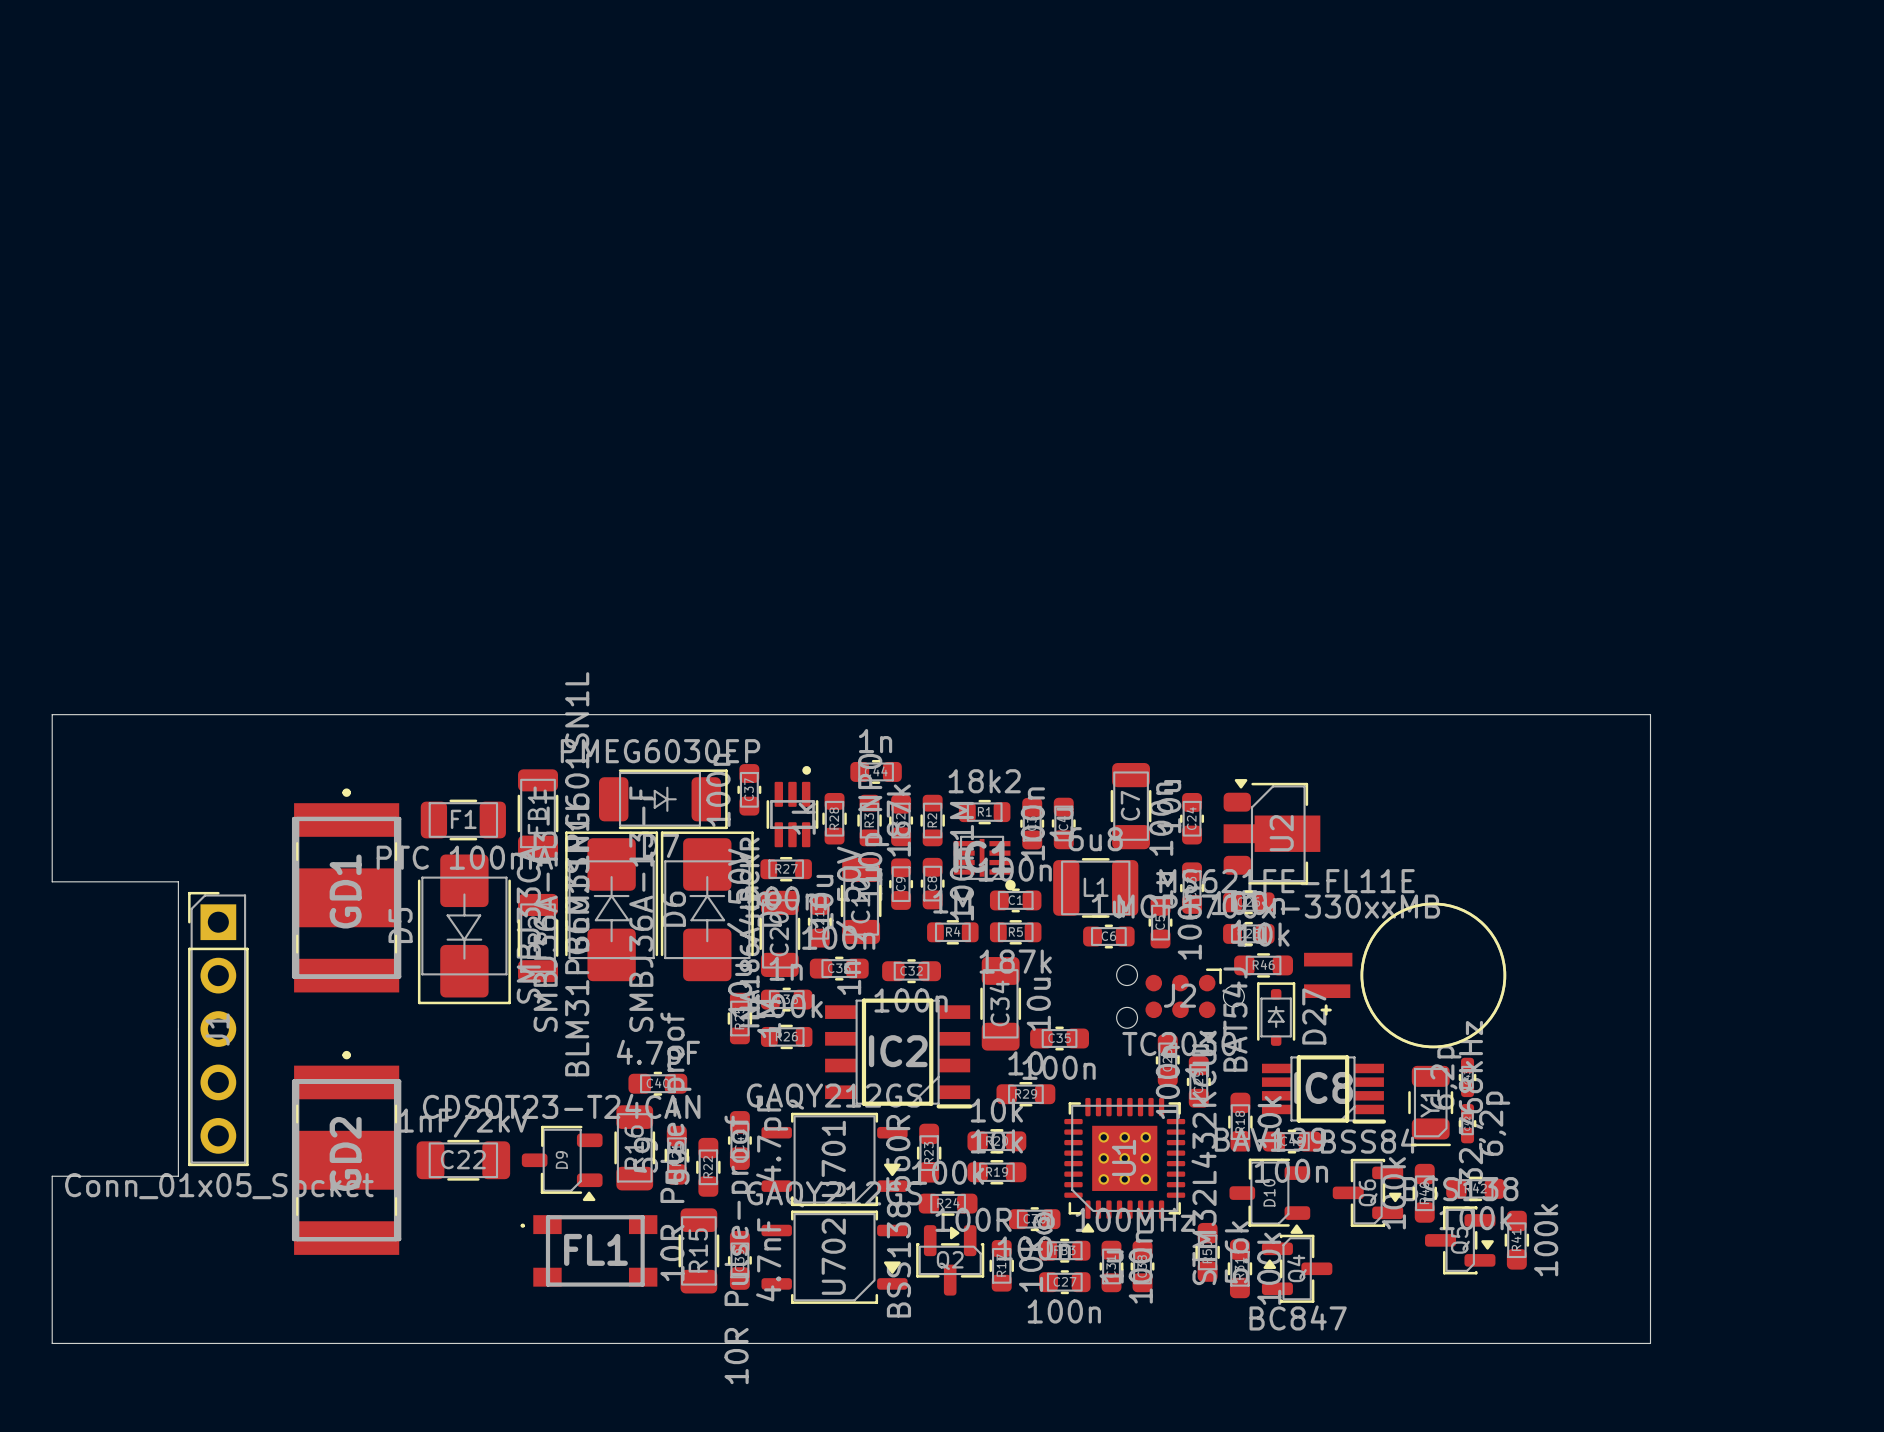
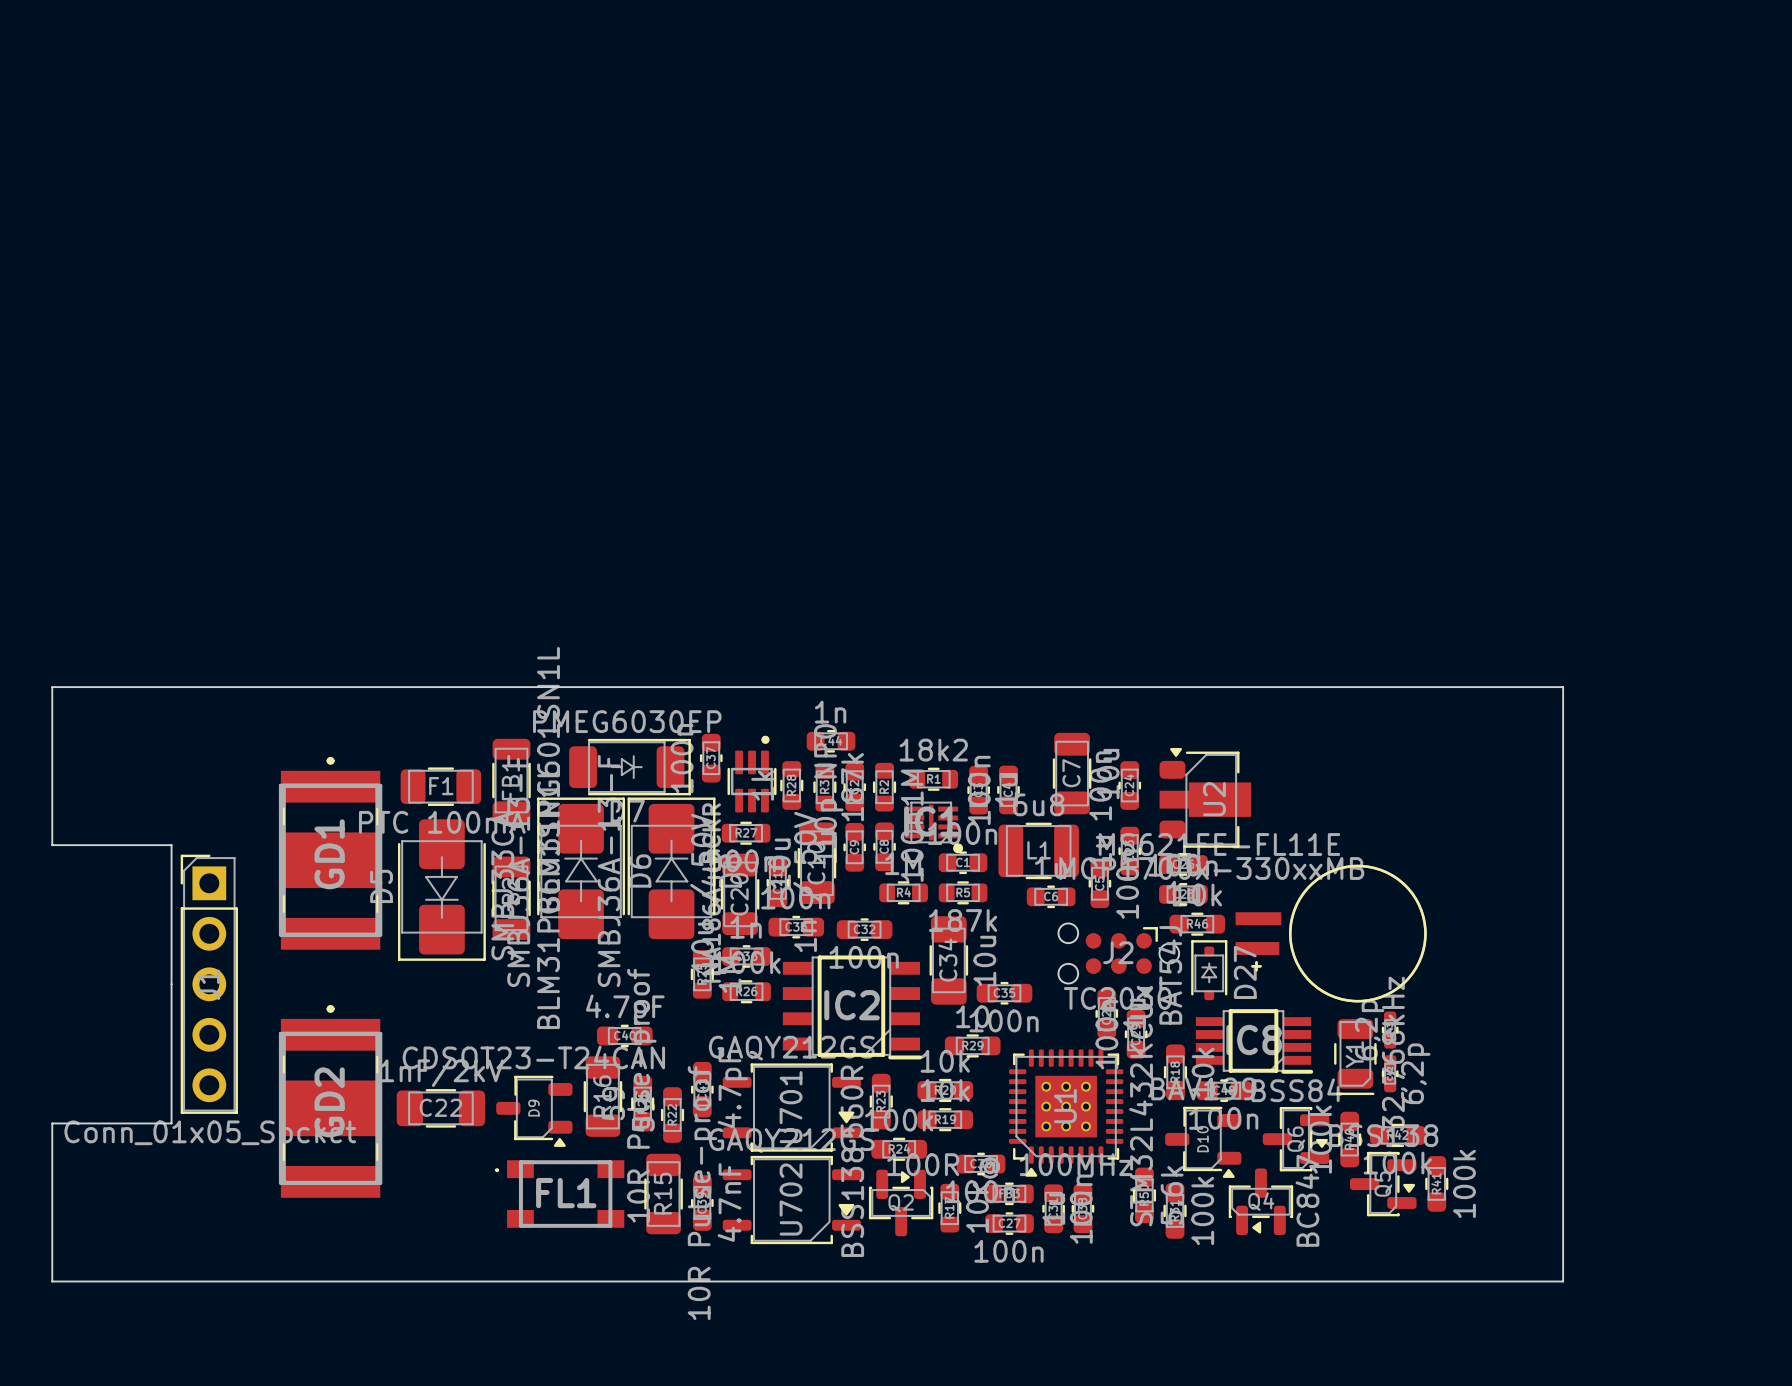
Q4 rotation: 0° (1297, 1268) -> 90° counterclockwise (1260, 1201)

